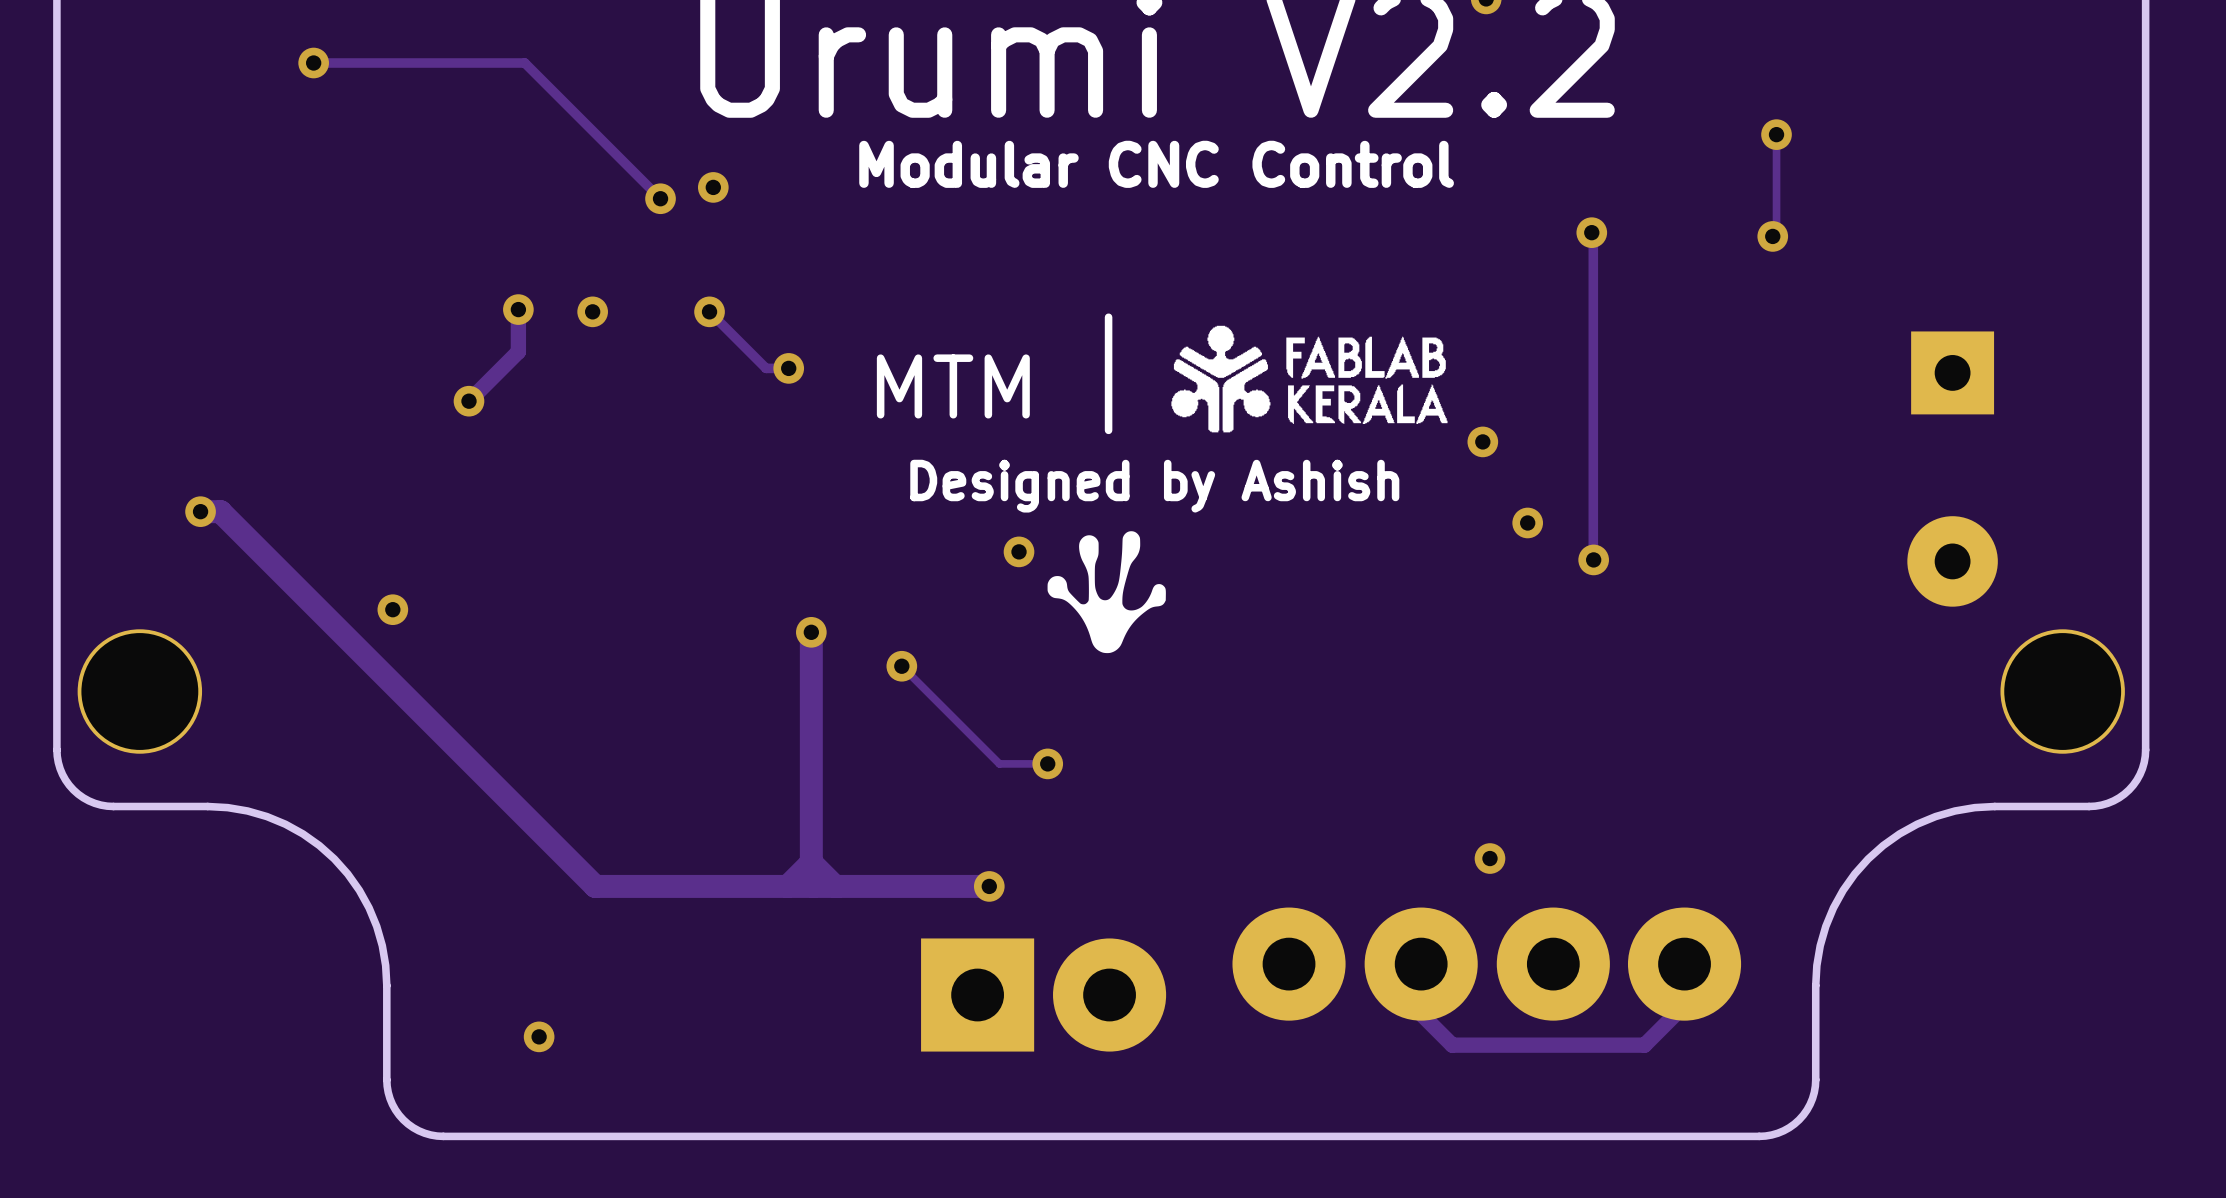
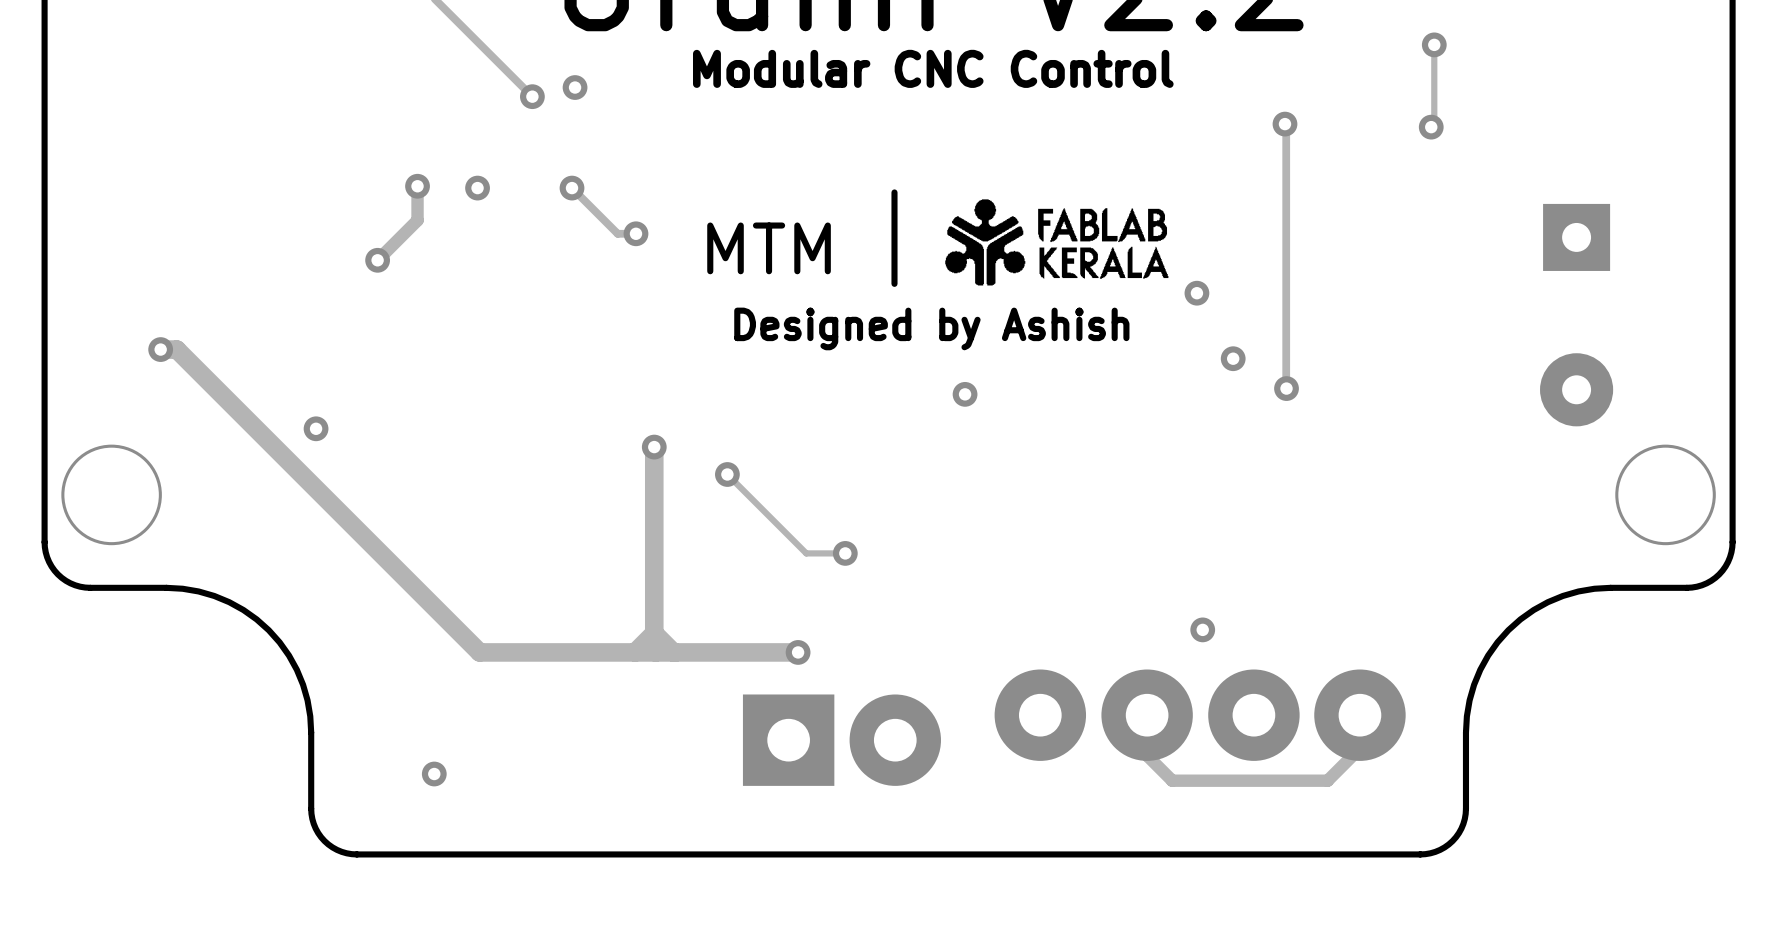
drawing: [1047, 531, 1166, 654] -> none
via position: (1019, 551) -> (965, 394)

